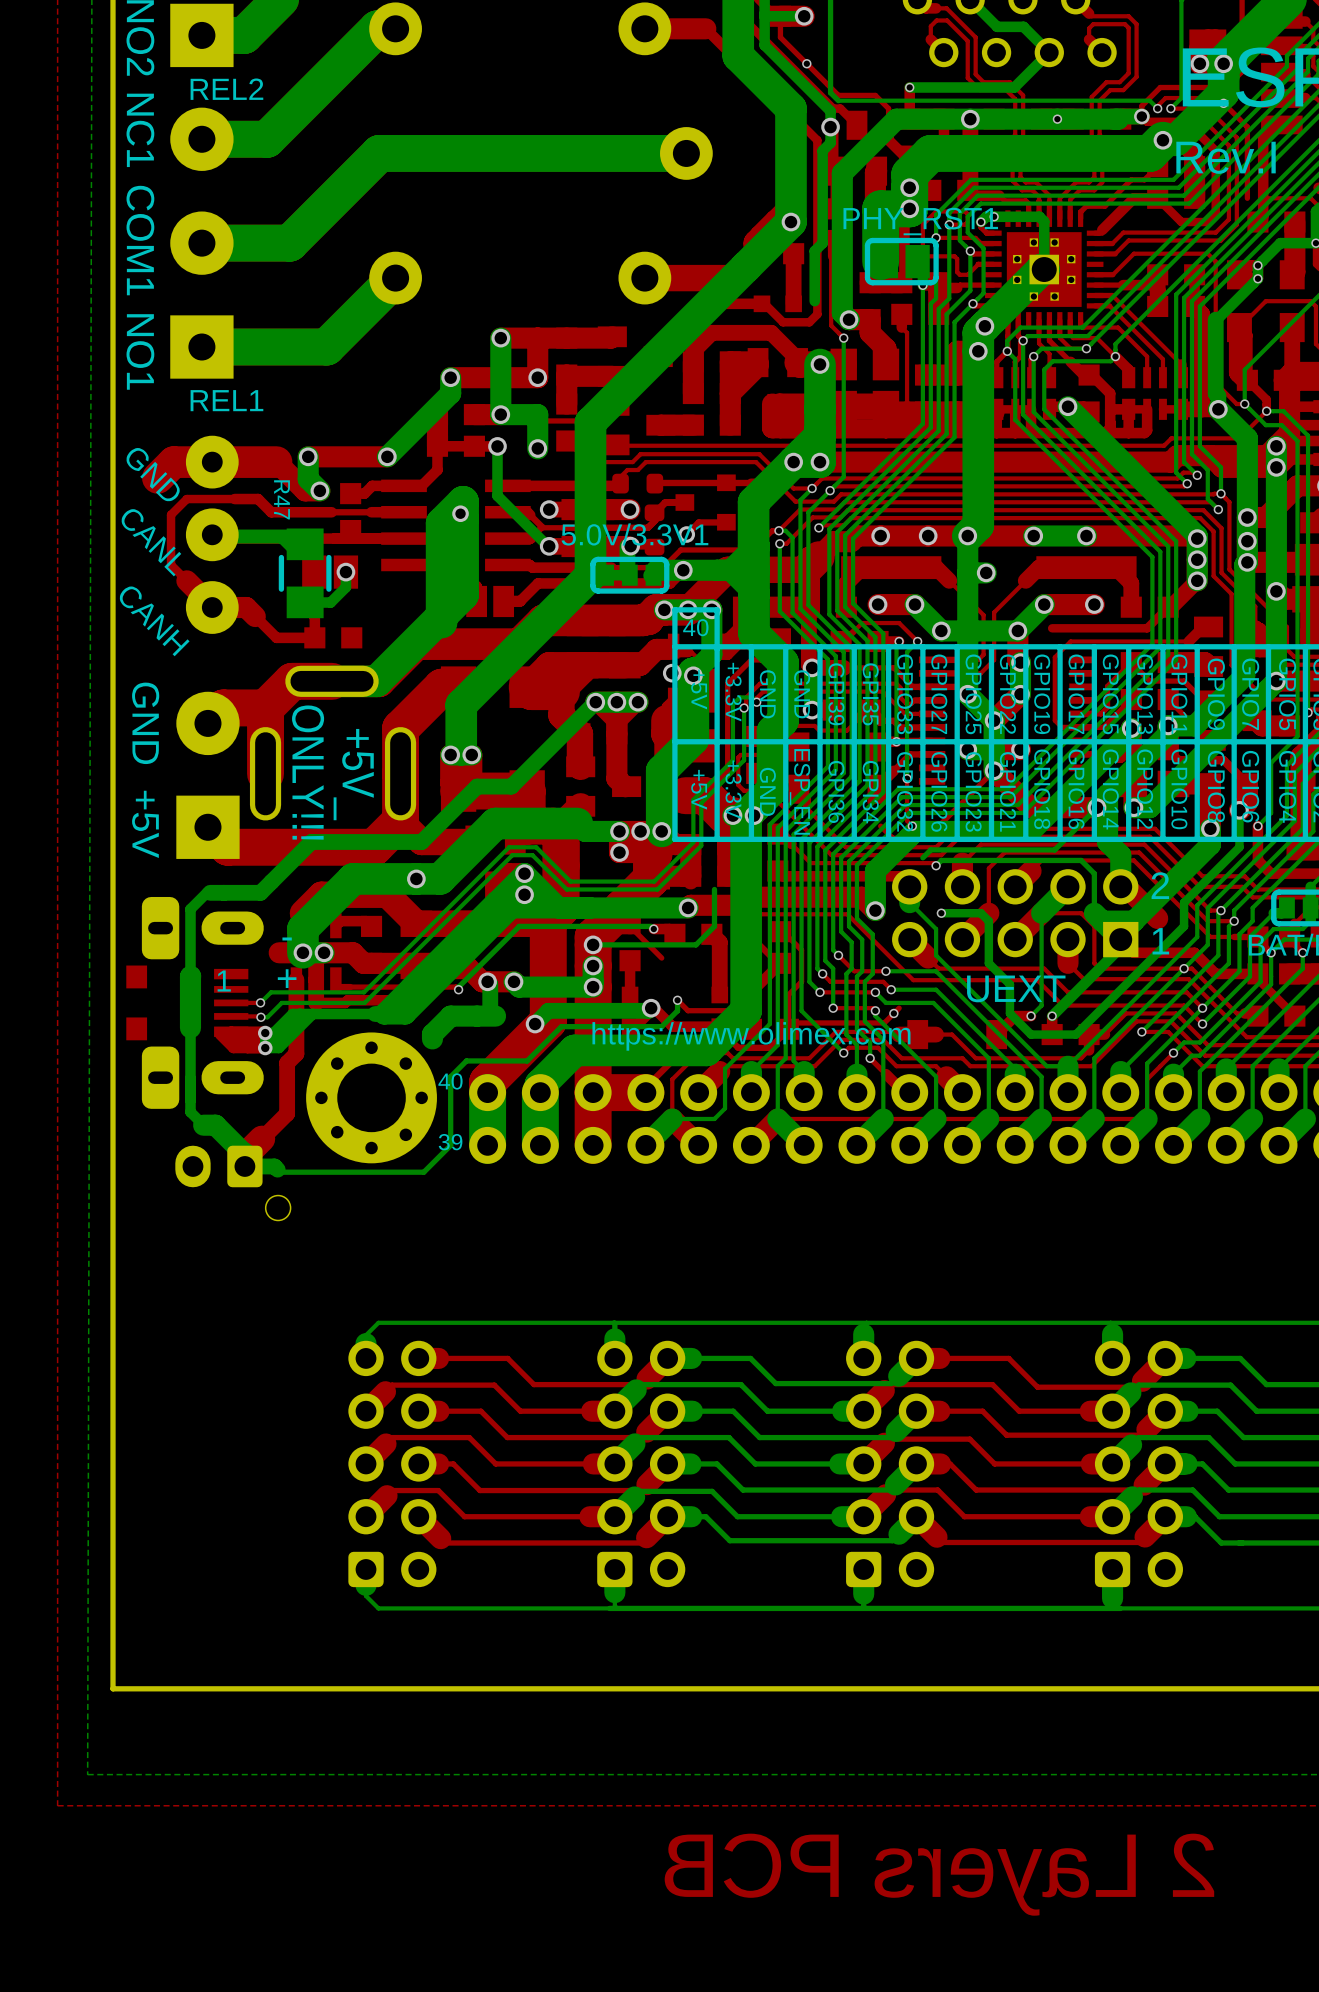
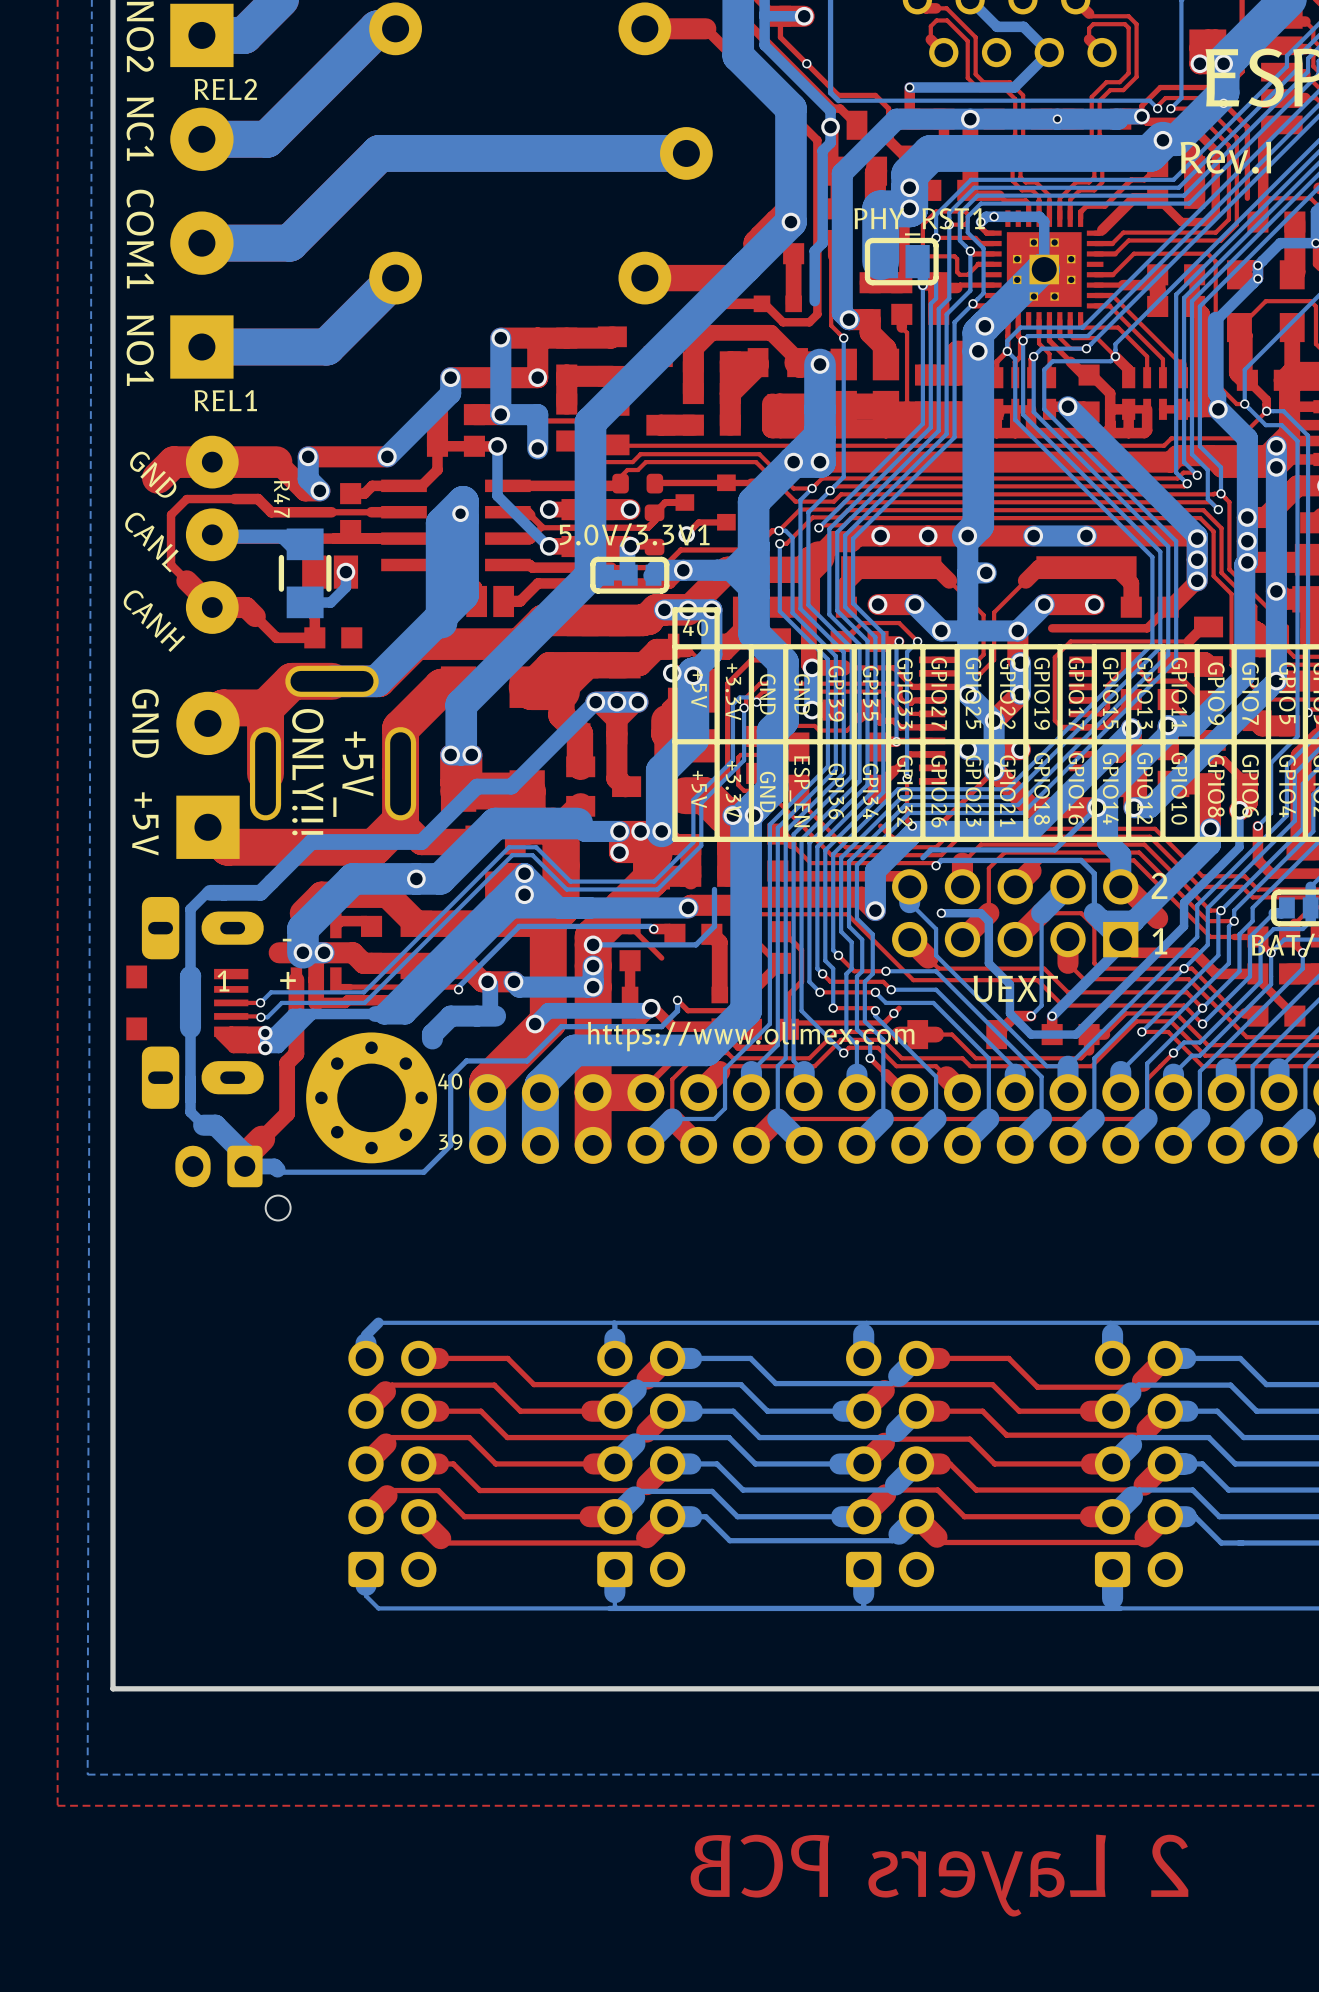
bottom track width: thin (378, 1322) (366, 1335) -> thick (378, 1322) (366, 1335)

